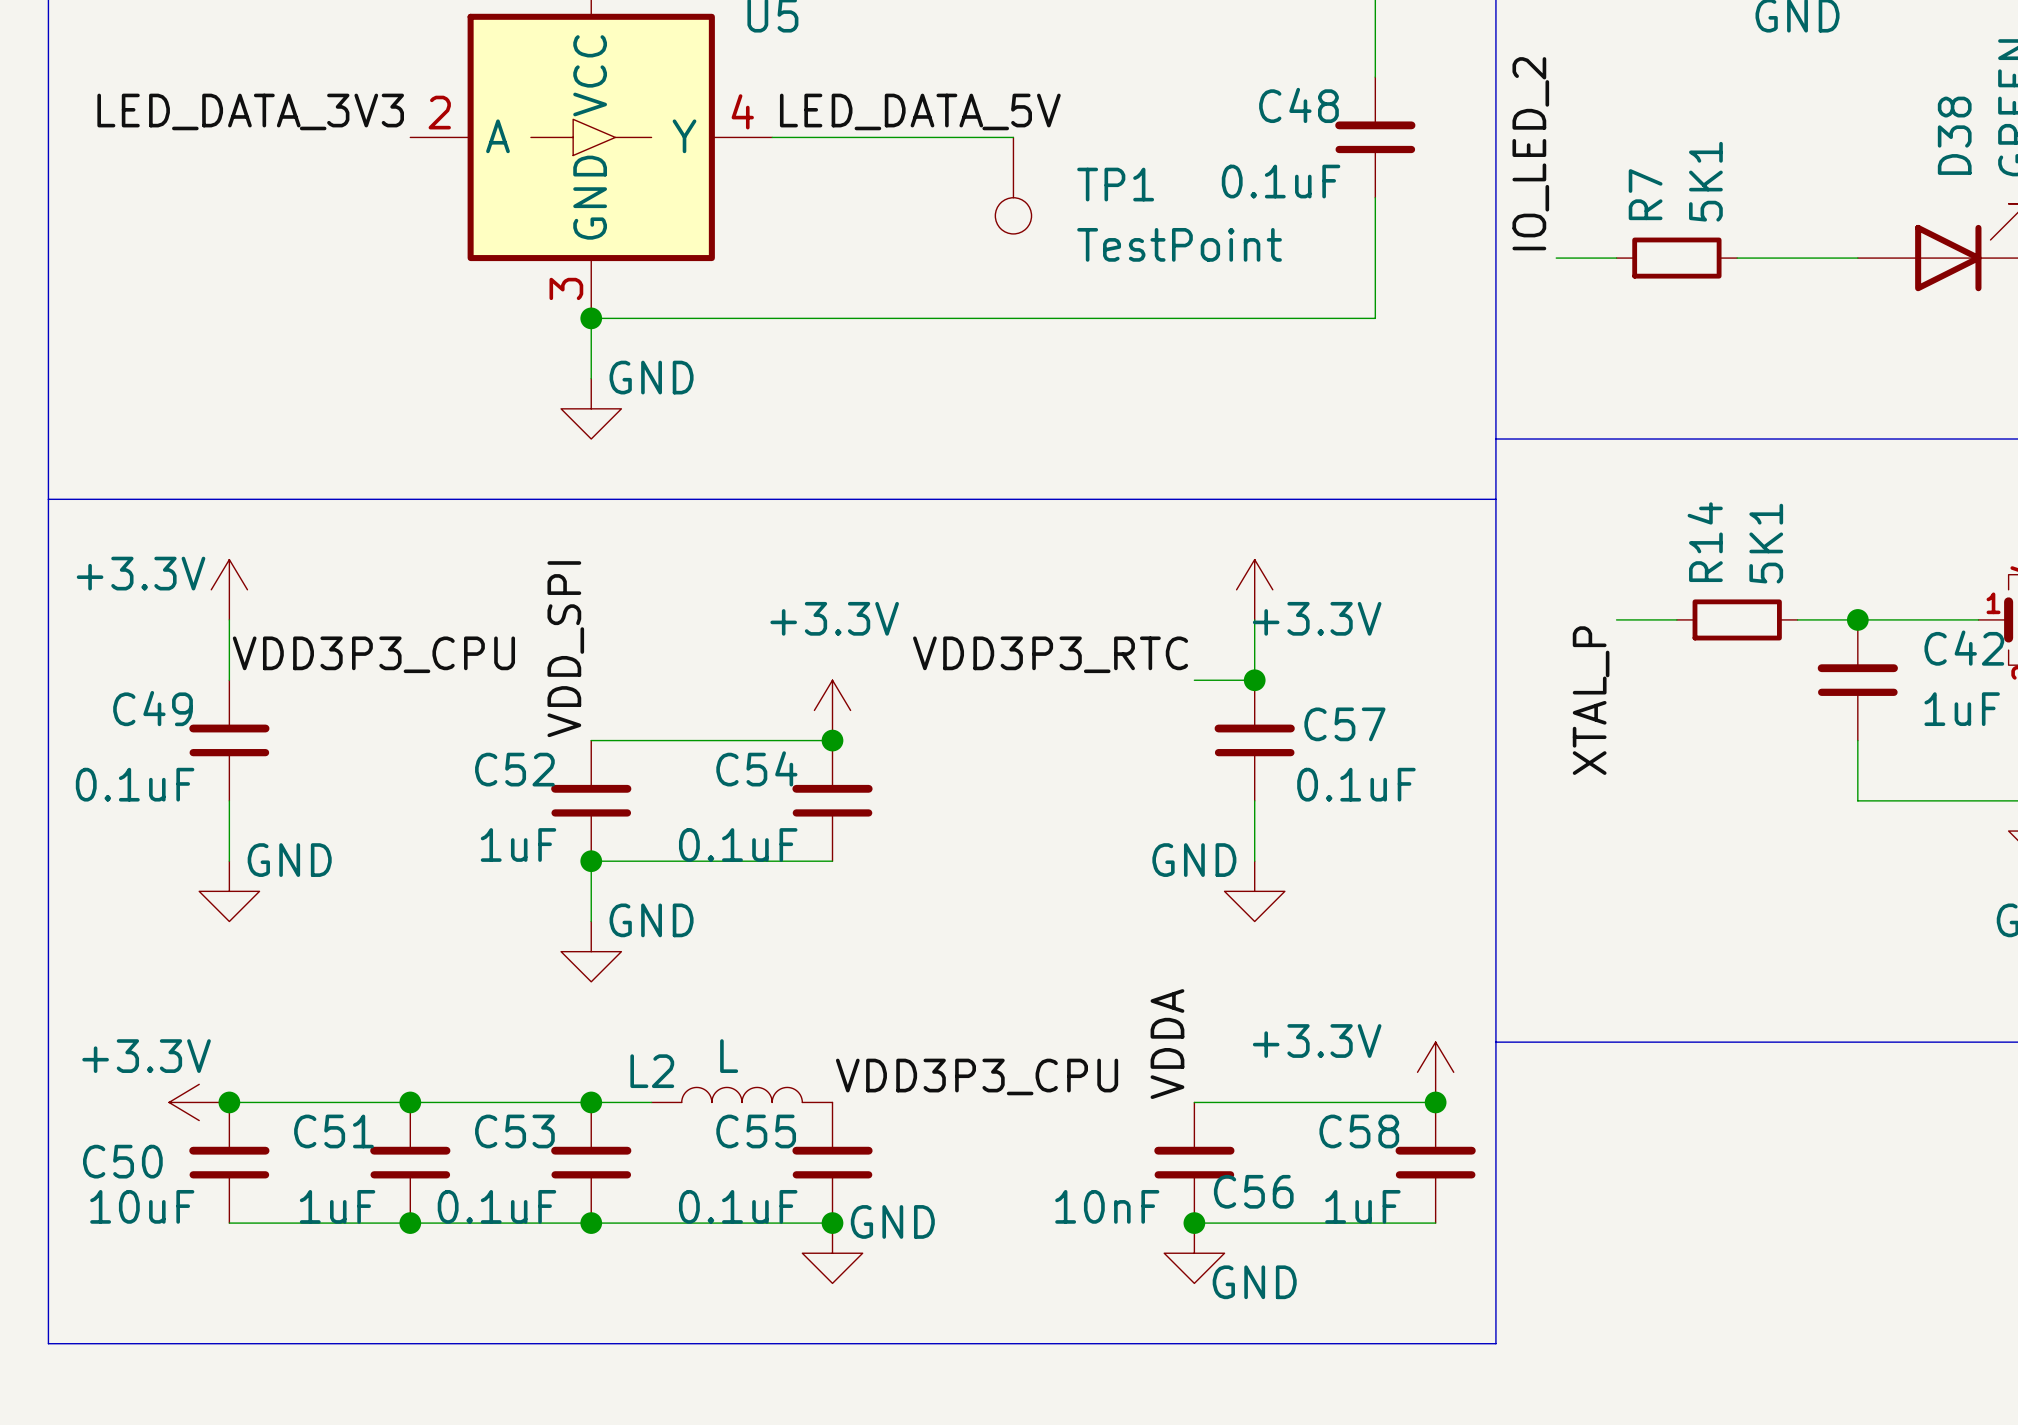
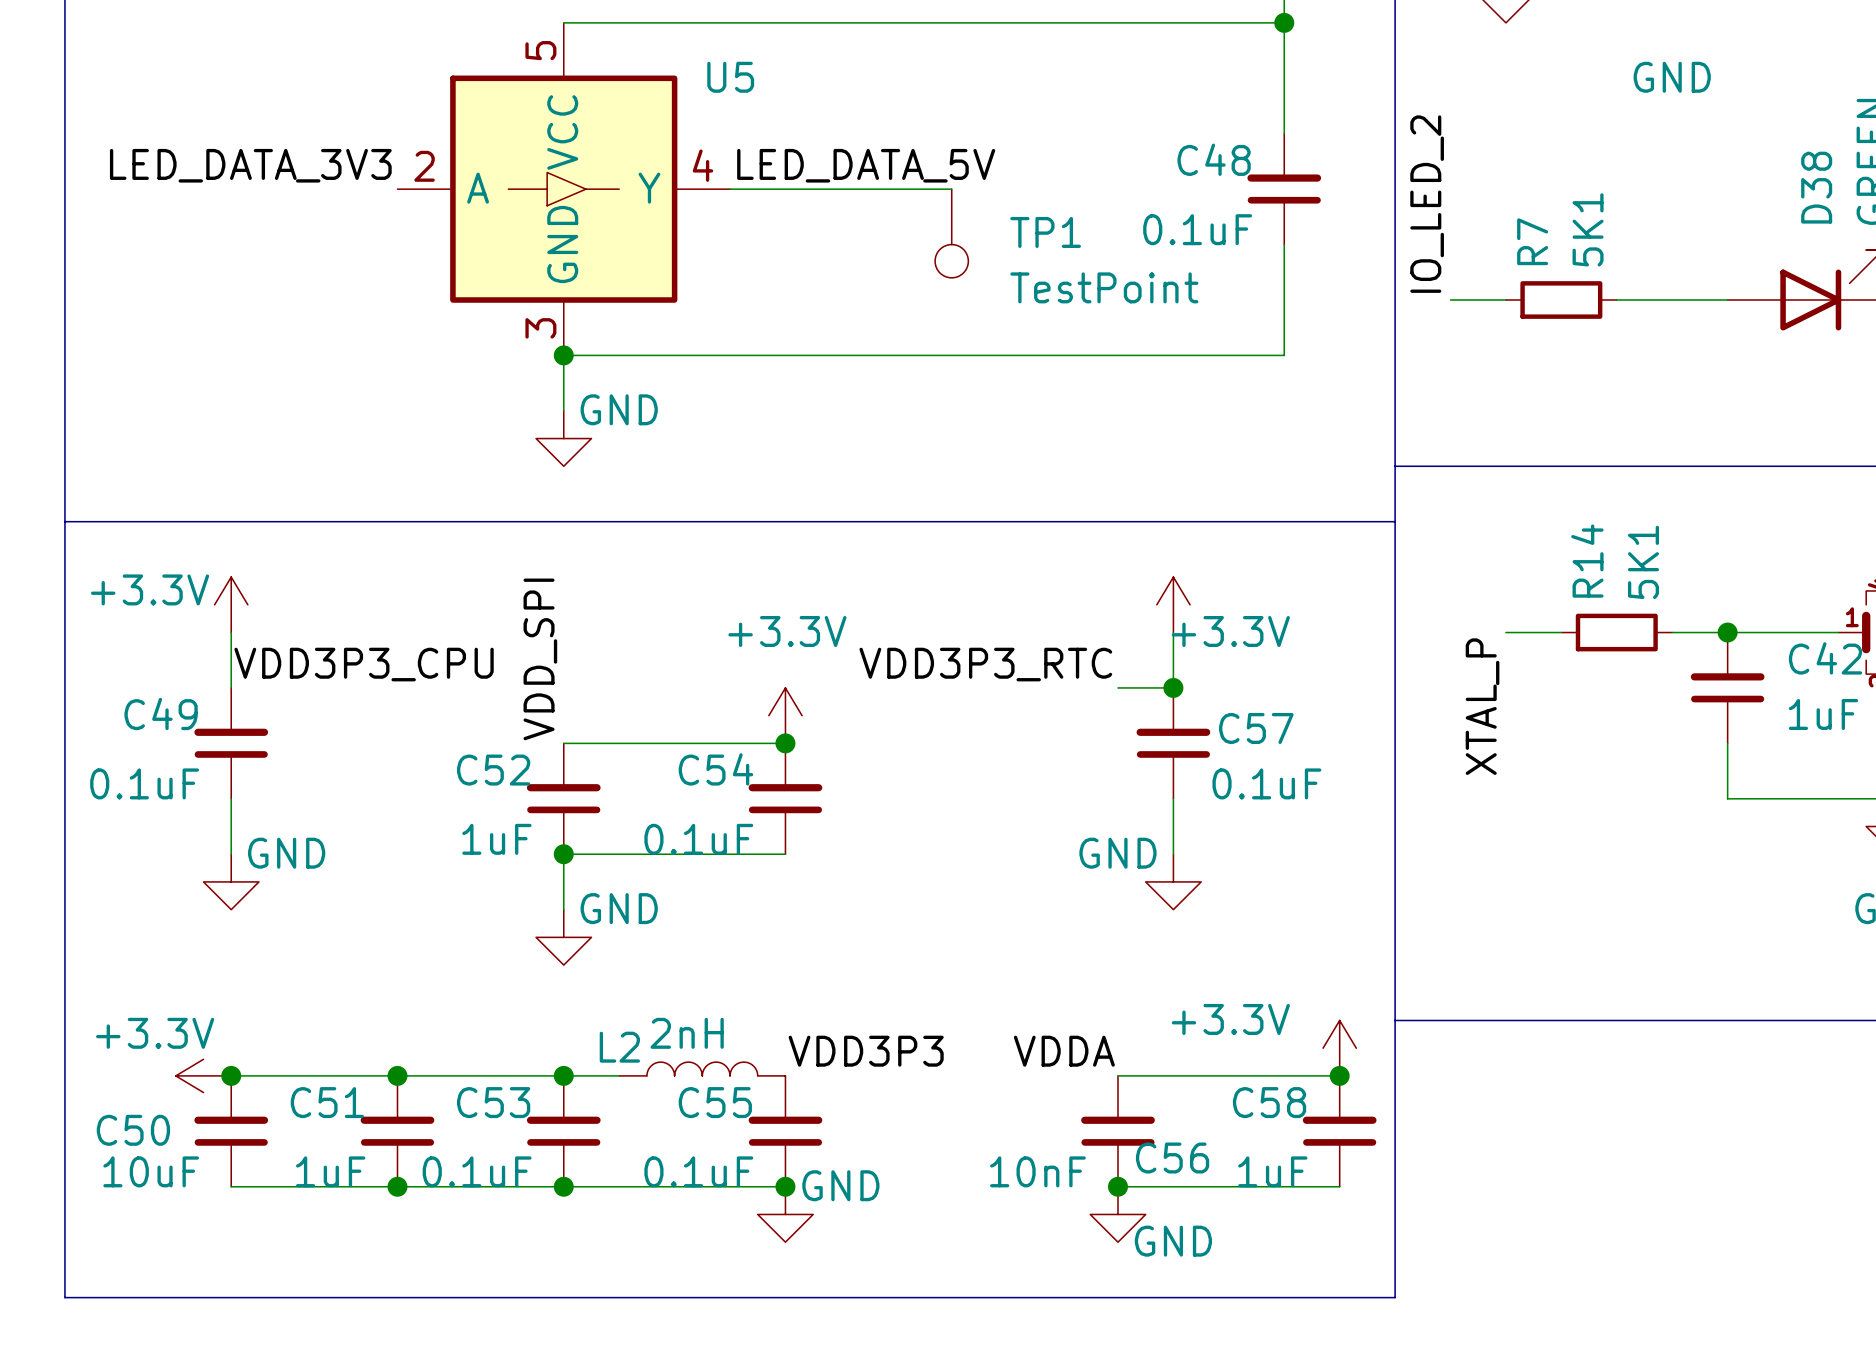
label rotation: 0° (1167, 1044) -> 90° clockwise (1064, 1051)
L2 value: L (729, 1056) -> 2nH (687, 1033)
label: VDD3P3_CPU (977, 1076) -> VDD3P3 (866, 1051)

